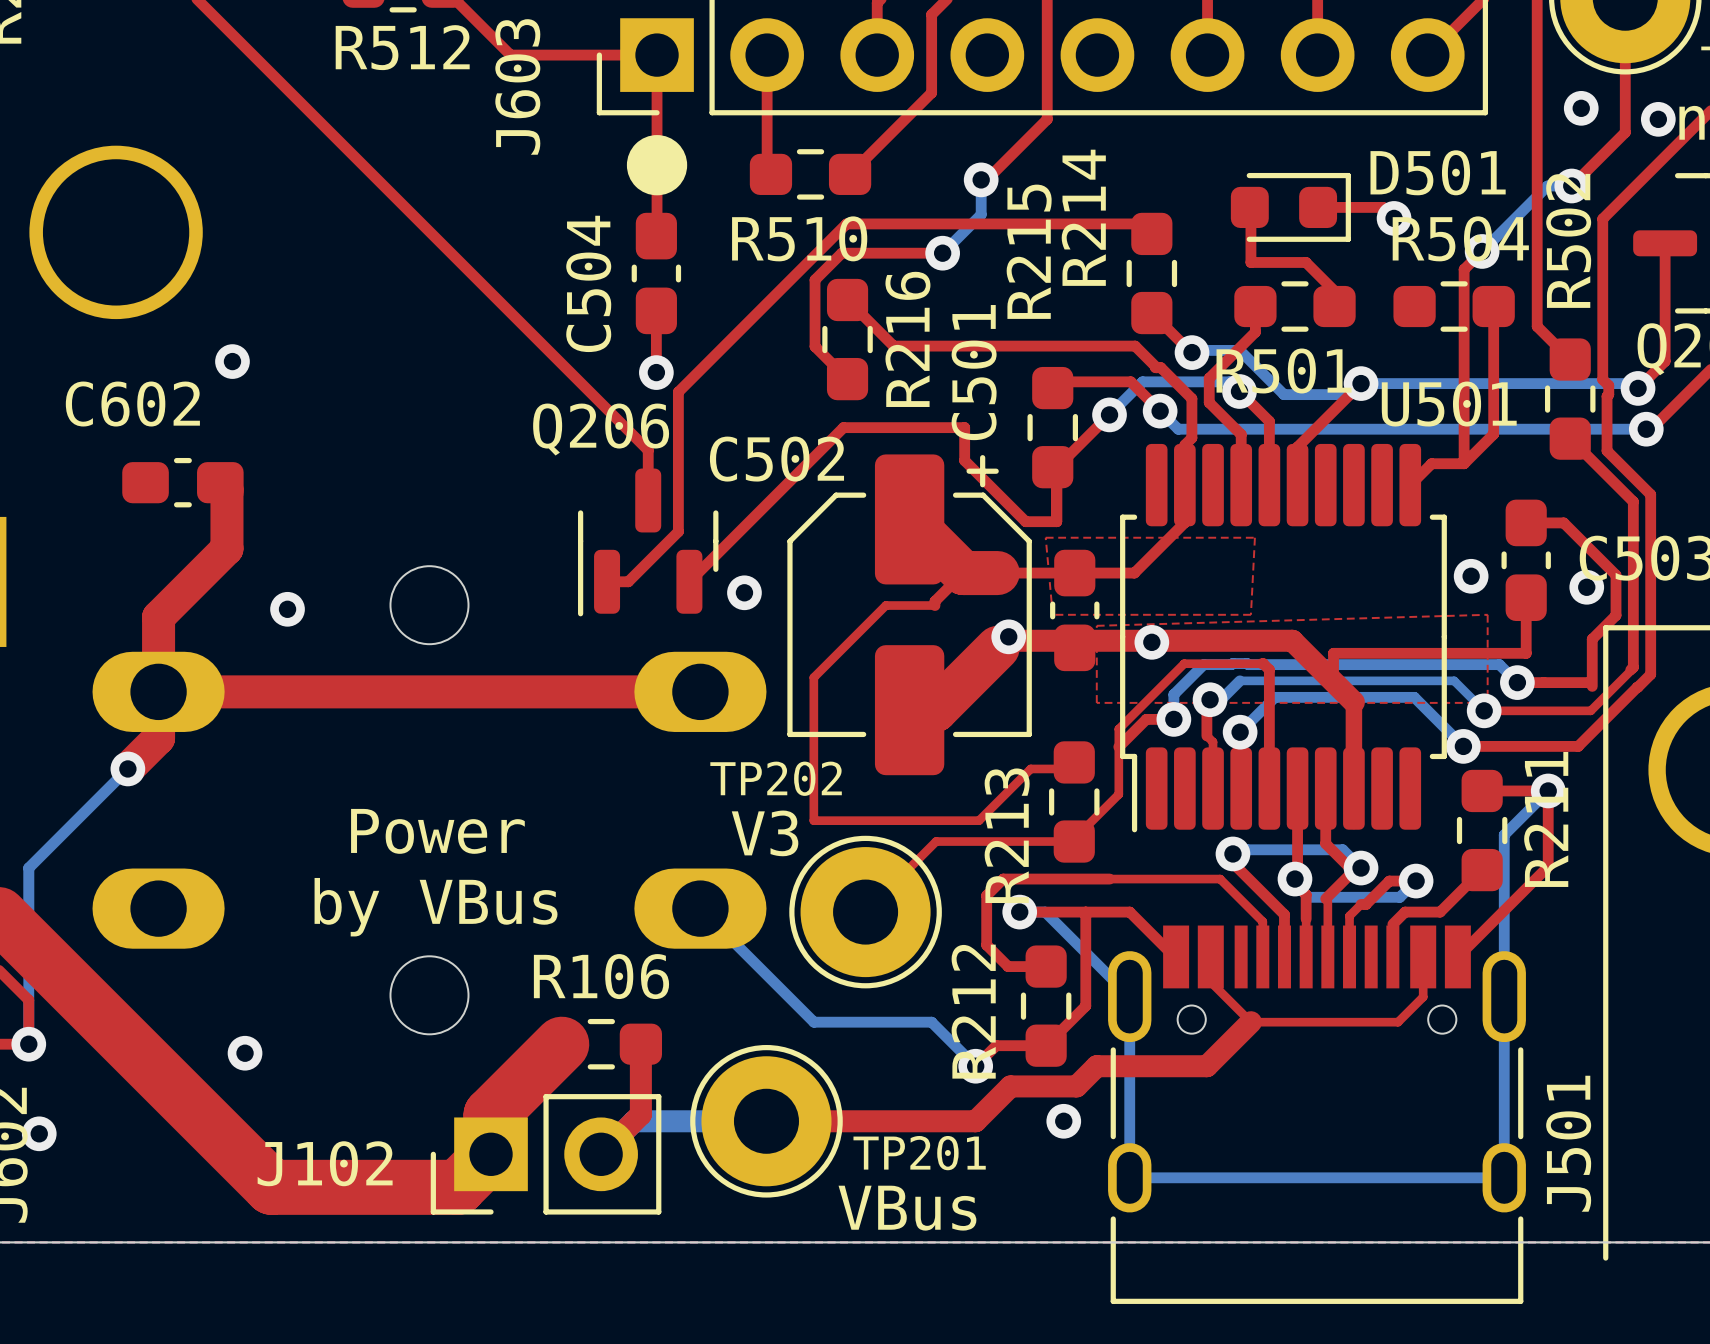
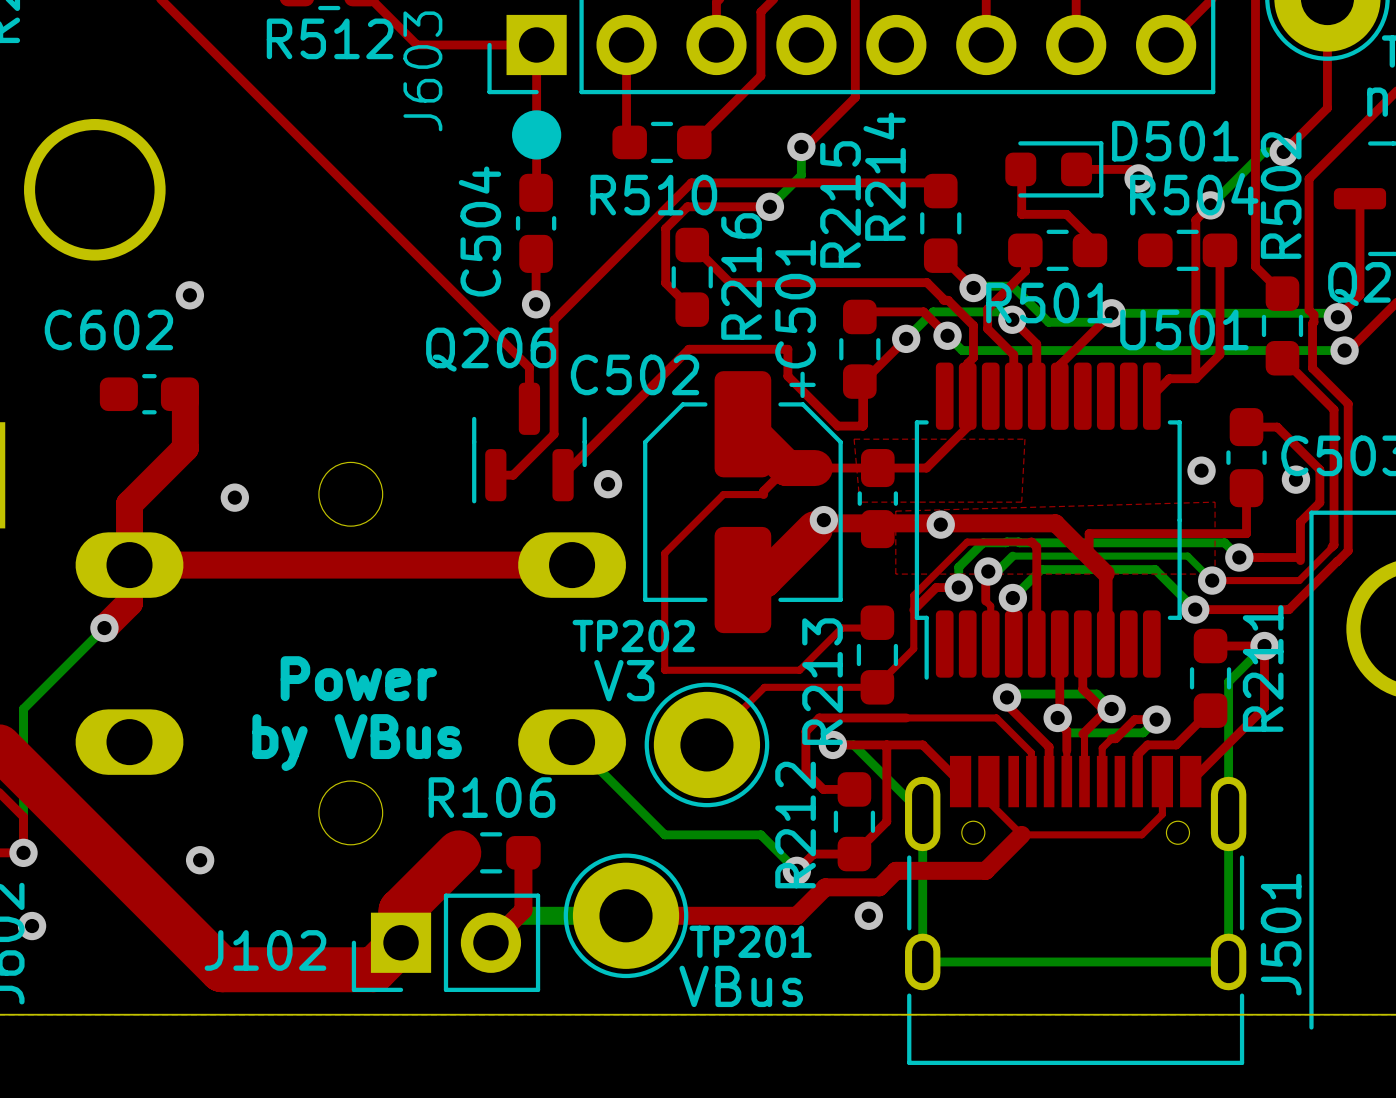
via: (1581, 108) -> none
via: (1658, 119) -> none

